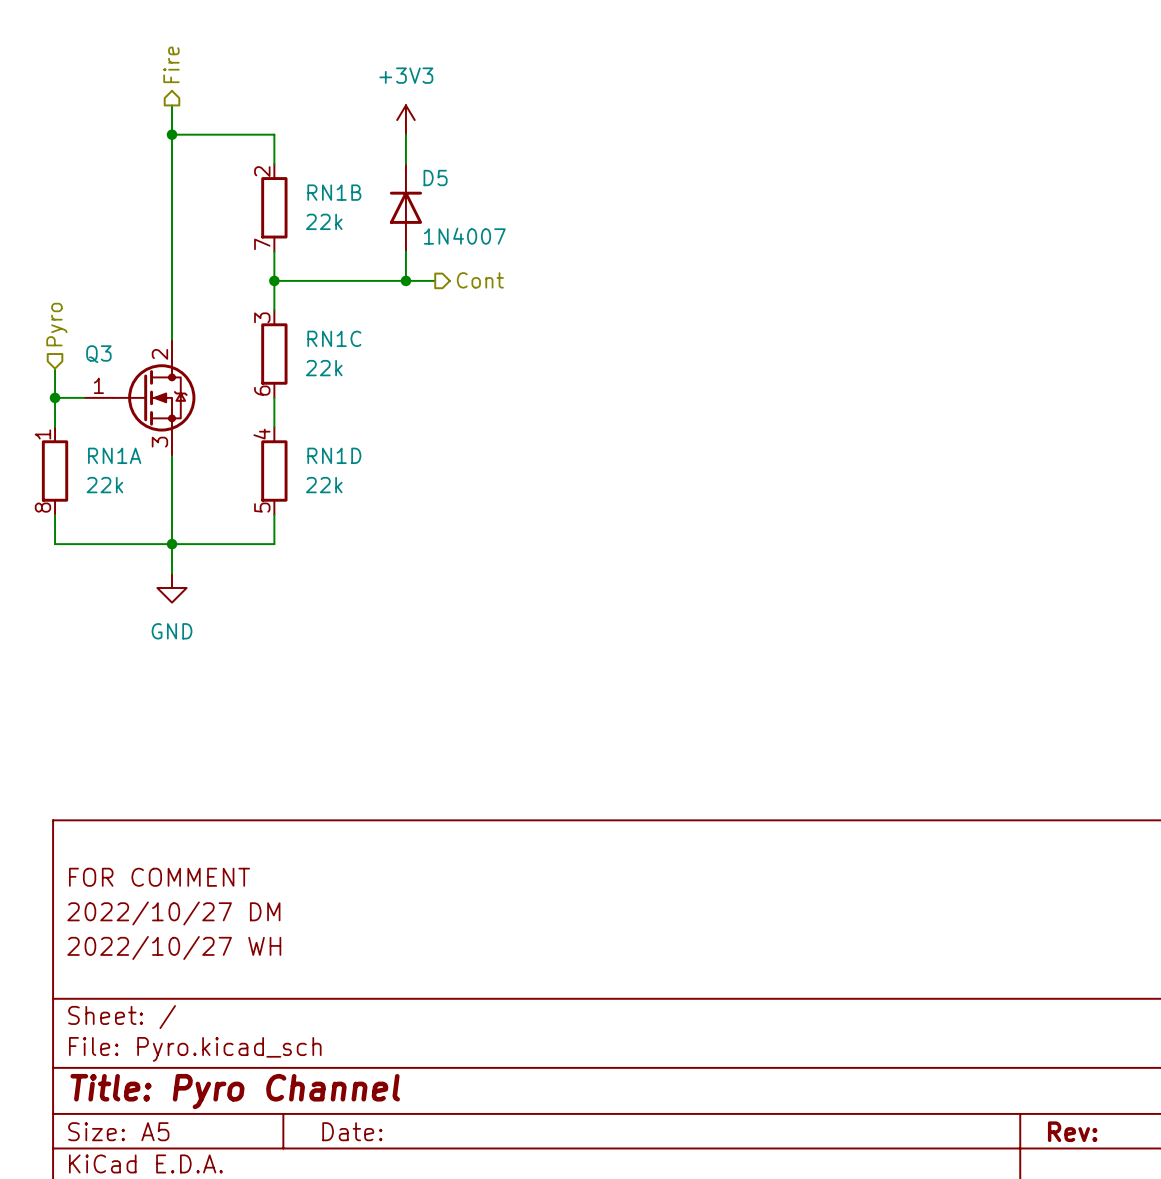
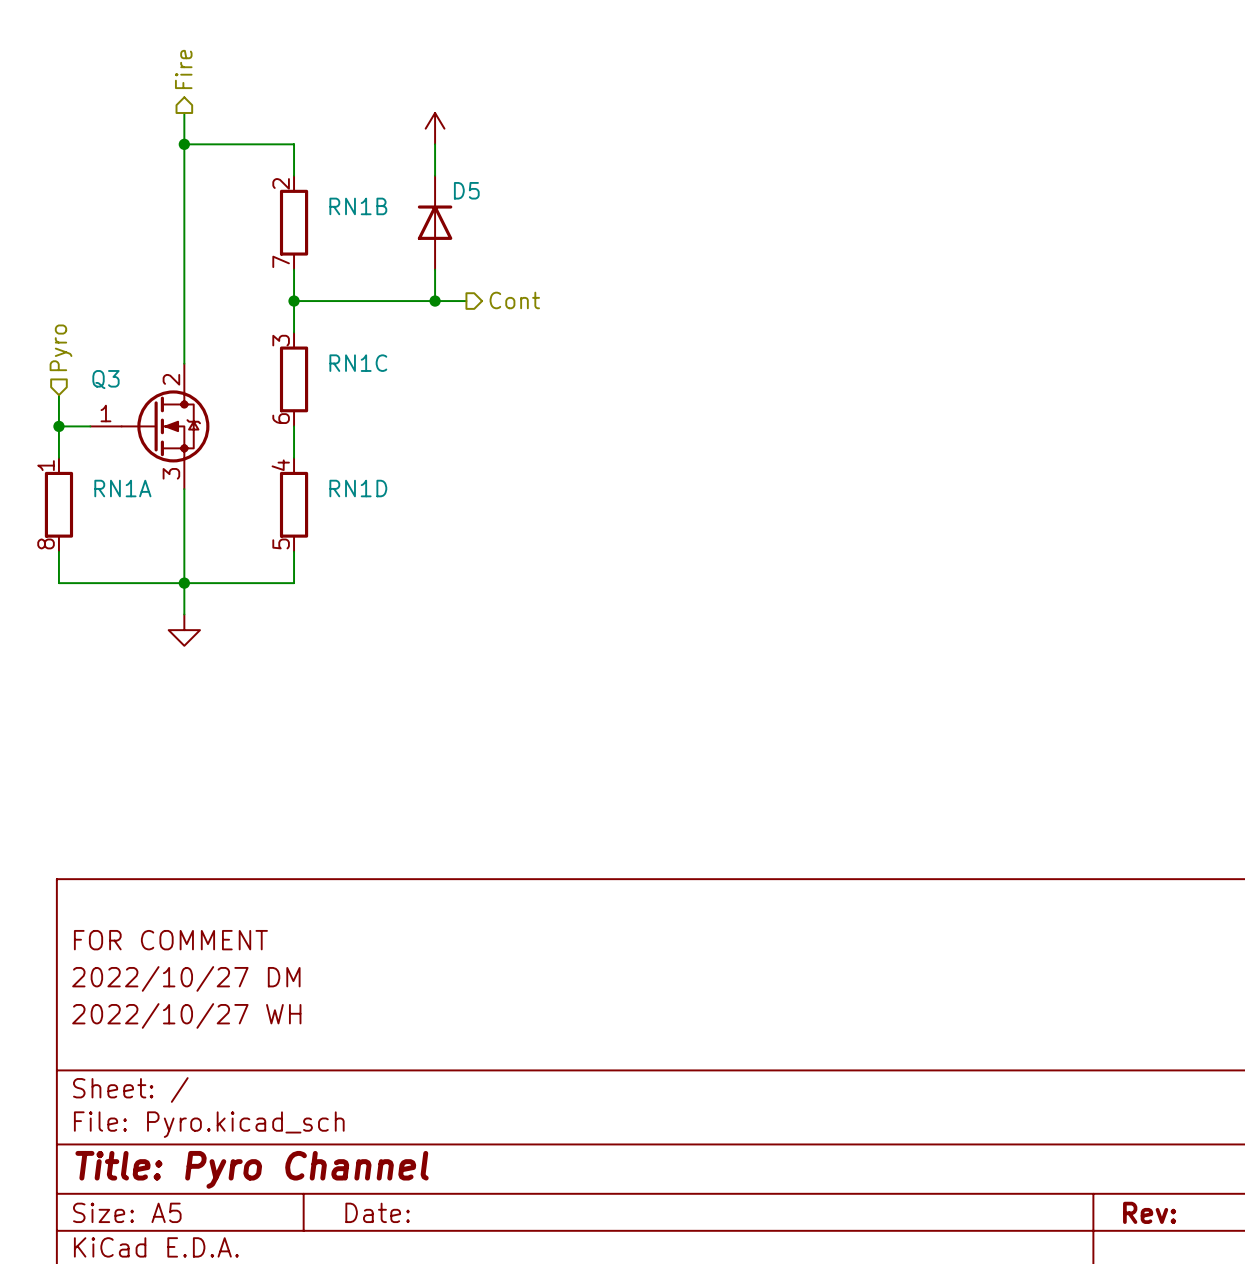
power symbol text: +3V3 (406, 75) -> none
RN1B value: 22k (324, 221) -> none
D5 value: 1N4007 (464, 236) -> none
RN1C value: 22k (324, 368) -> none
RN1A value: 22k (104, 485) -> none
RN1D value: 22k (324, 485) -> none
power symbol text: GND (172, 631) -> none

